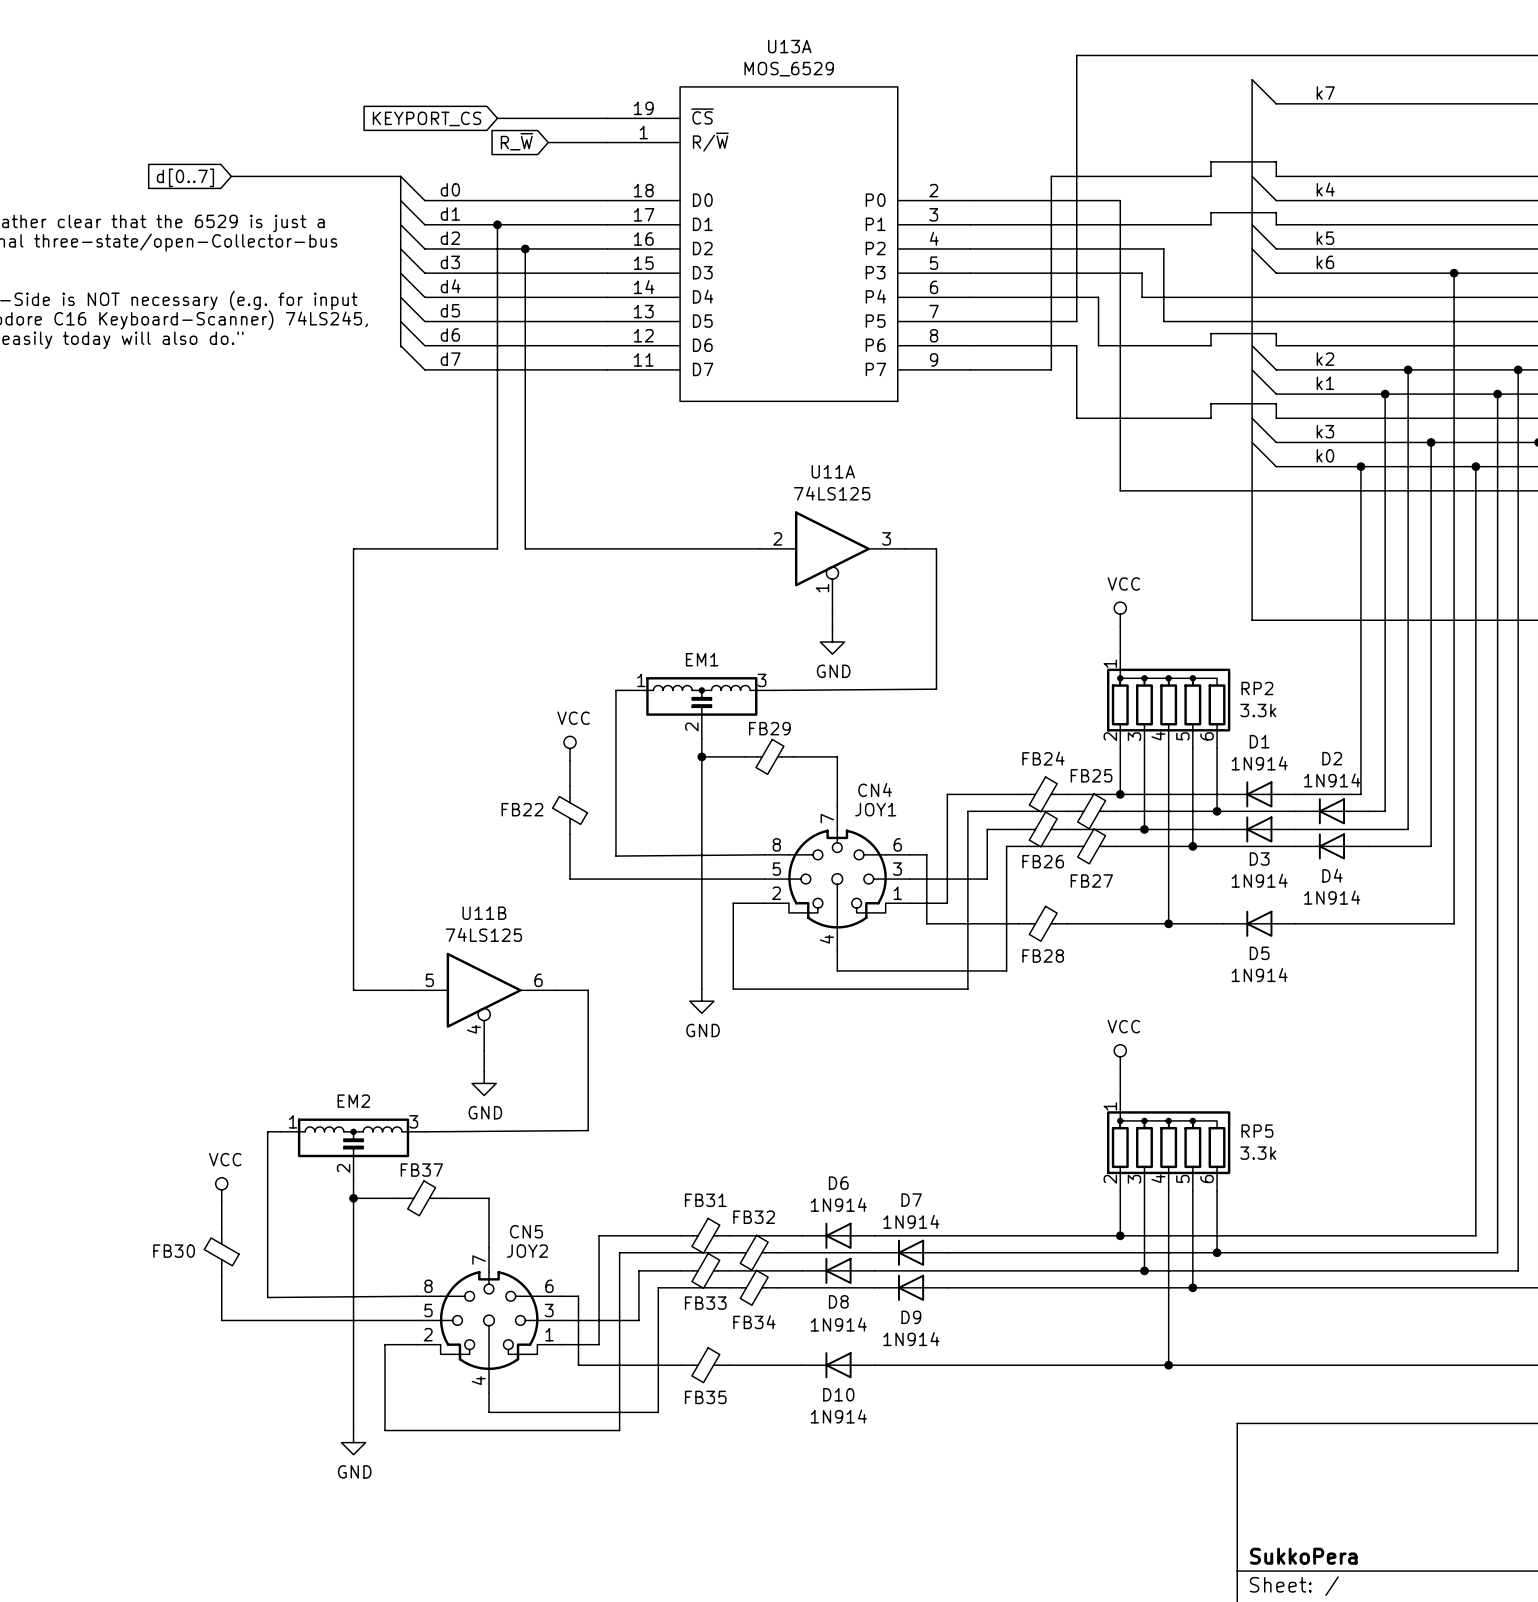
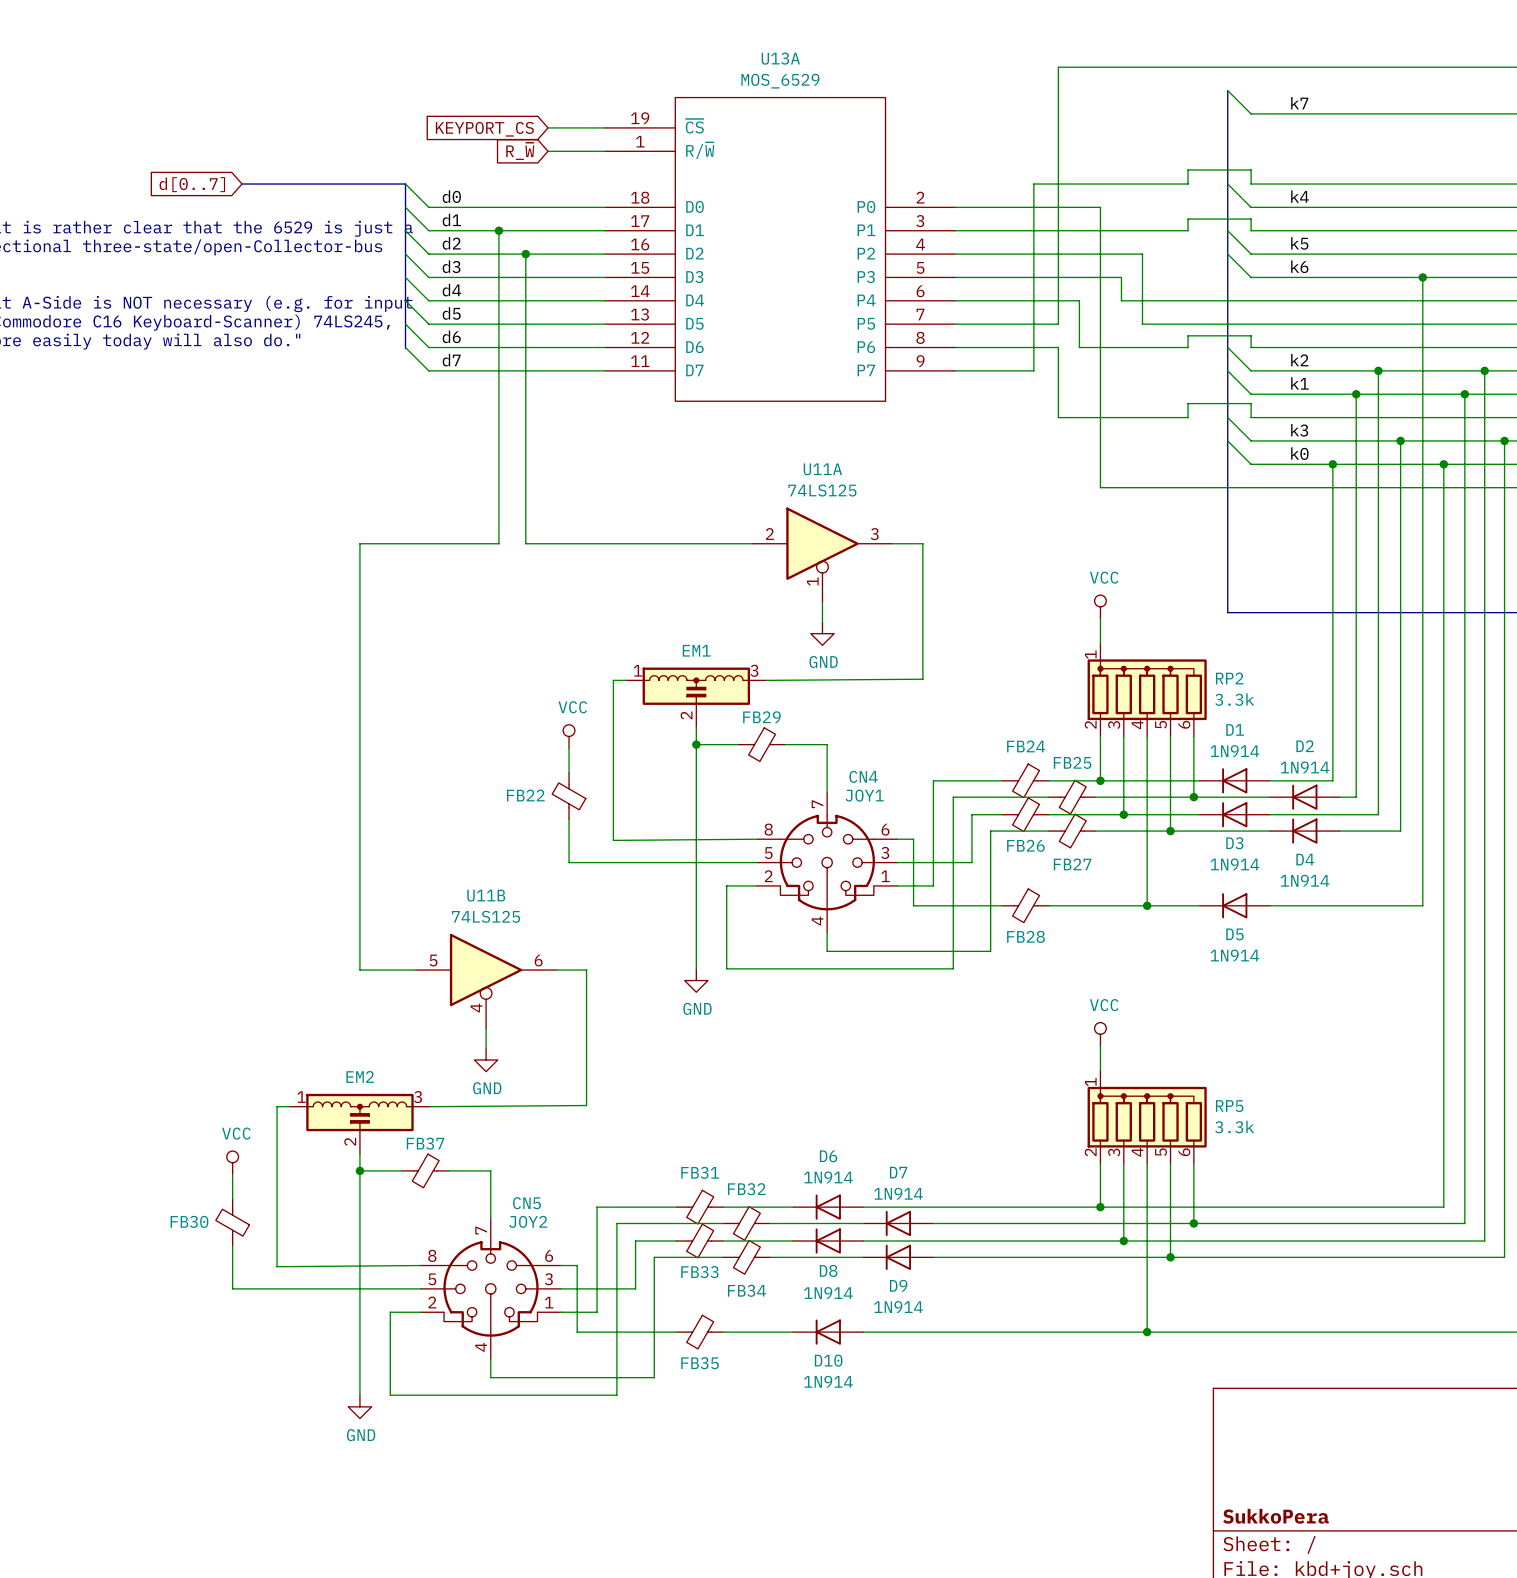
global label position: KEYPORT_CS (427, 118) -> KEYPORT_CS (484, 129)
wire: (497, 118) (548, 118) -> none

